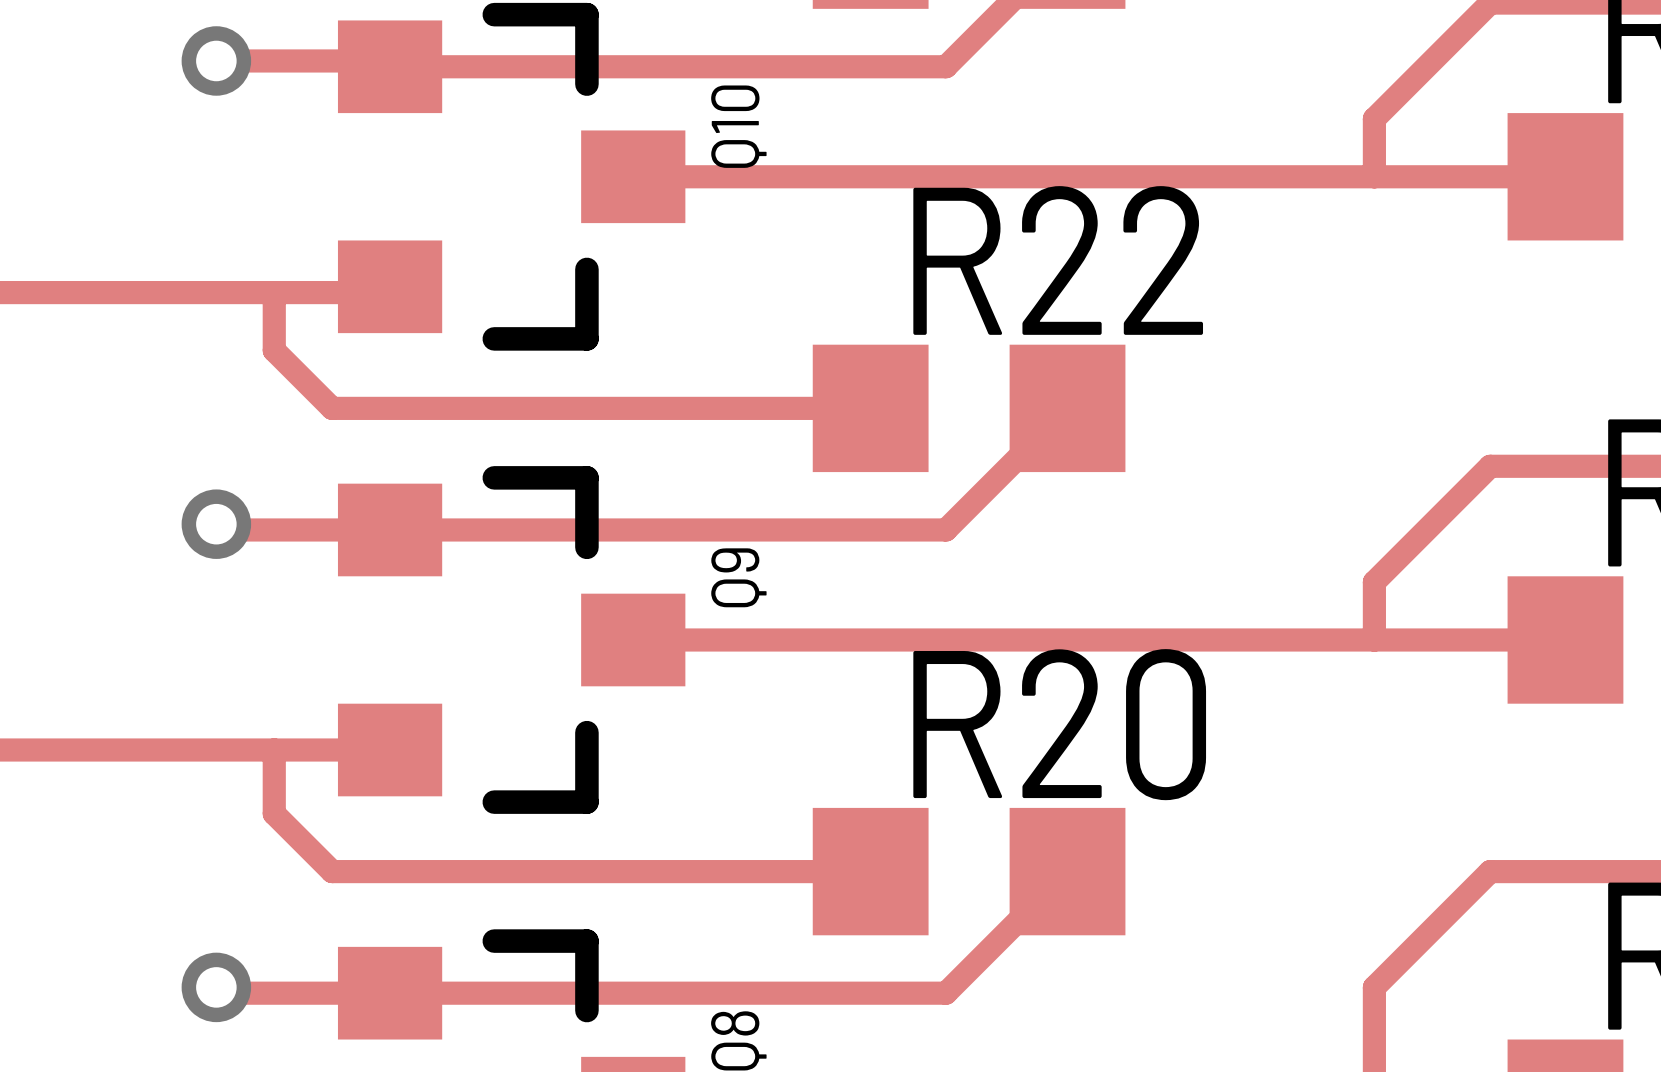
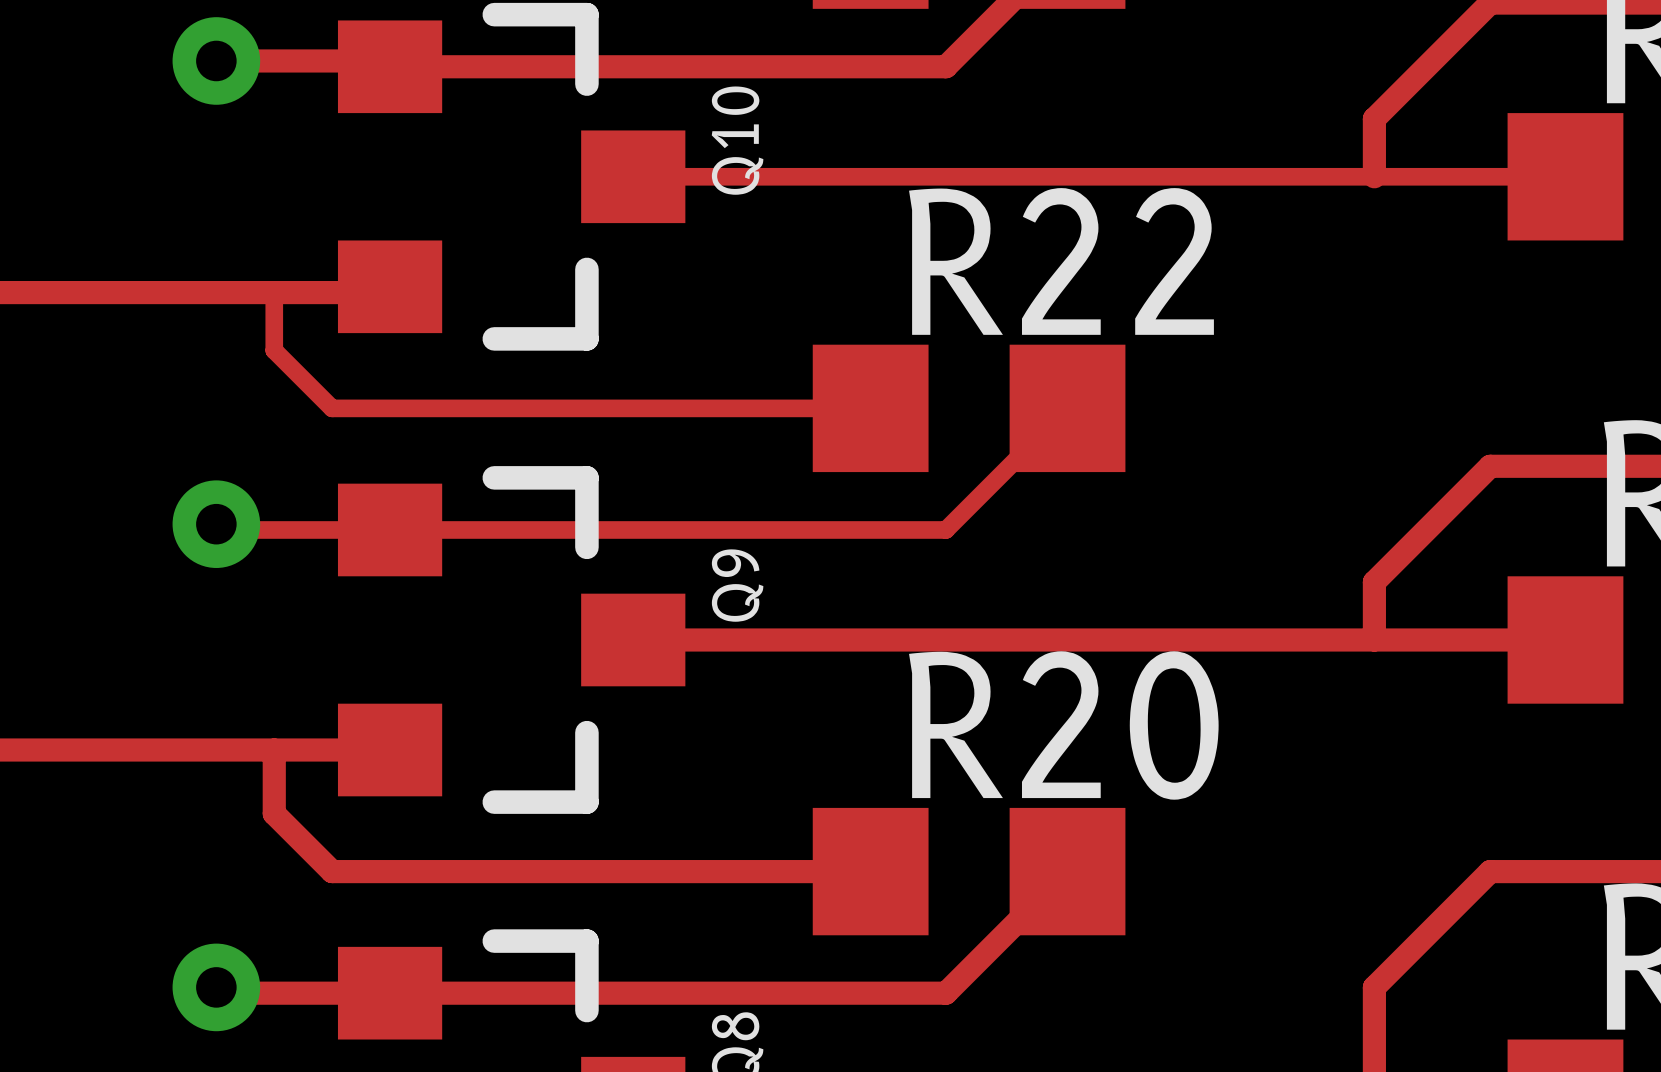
via size: [181, 26, 252, 96] -> [172, 17, 261, 105]
track width: thick (633, 176) (1565, 176) -> thin (633, 176) (1565, 176)
track width: thick (274, 292) (274, 350) (332, 408) (870, 408) -> thin (274, 292) (274, 350) (332, 408) (870, 408)
track width: thick (1067, 408) (945, 529) (222, 529) (216, 524) -> thin (1067, 408) (945, 529) (222, 529) (216, 524)
via size: [181, 489, 252, 559] -> [172, 480, 261, 568]
via size: [181, 952, 252, 1023] -> [172, 943, 261, 1032]

